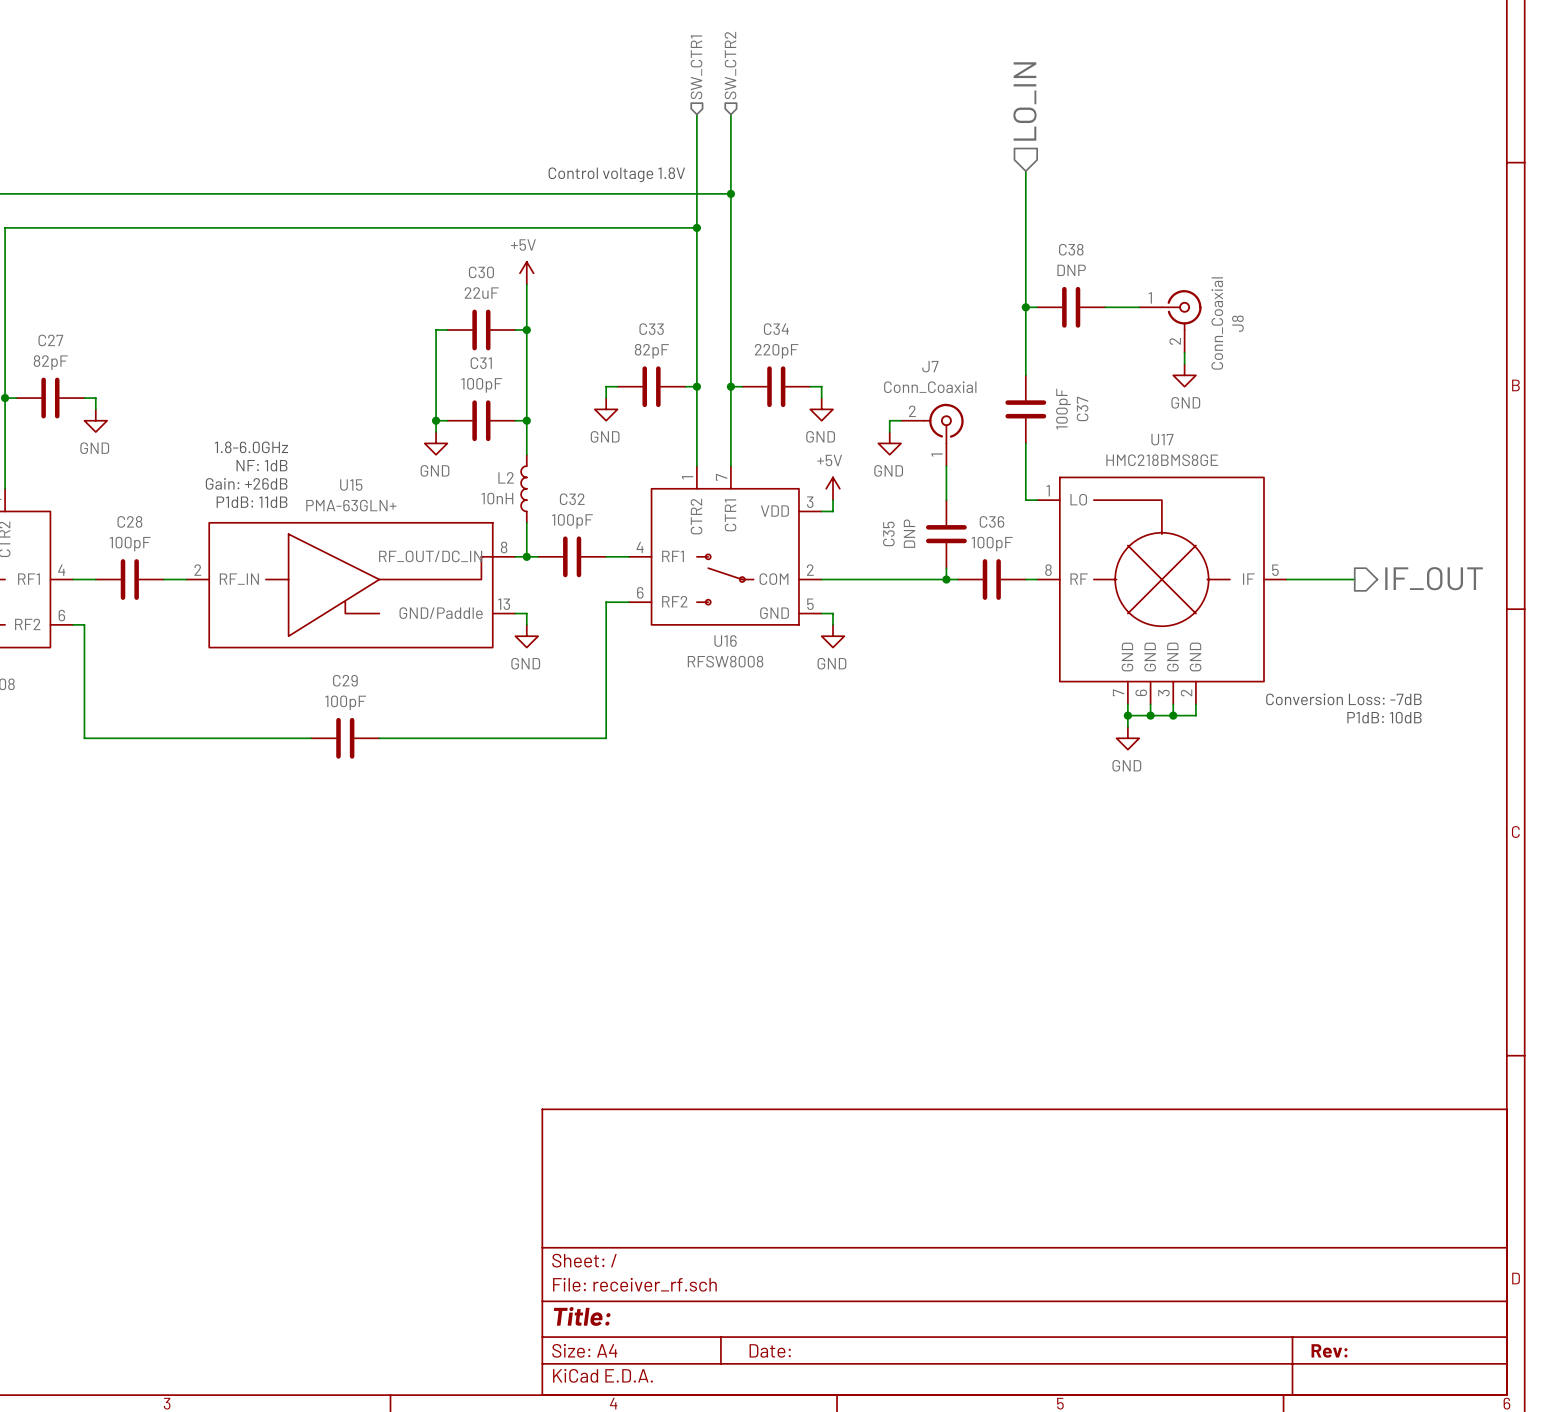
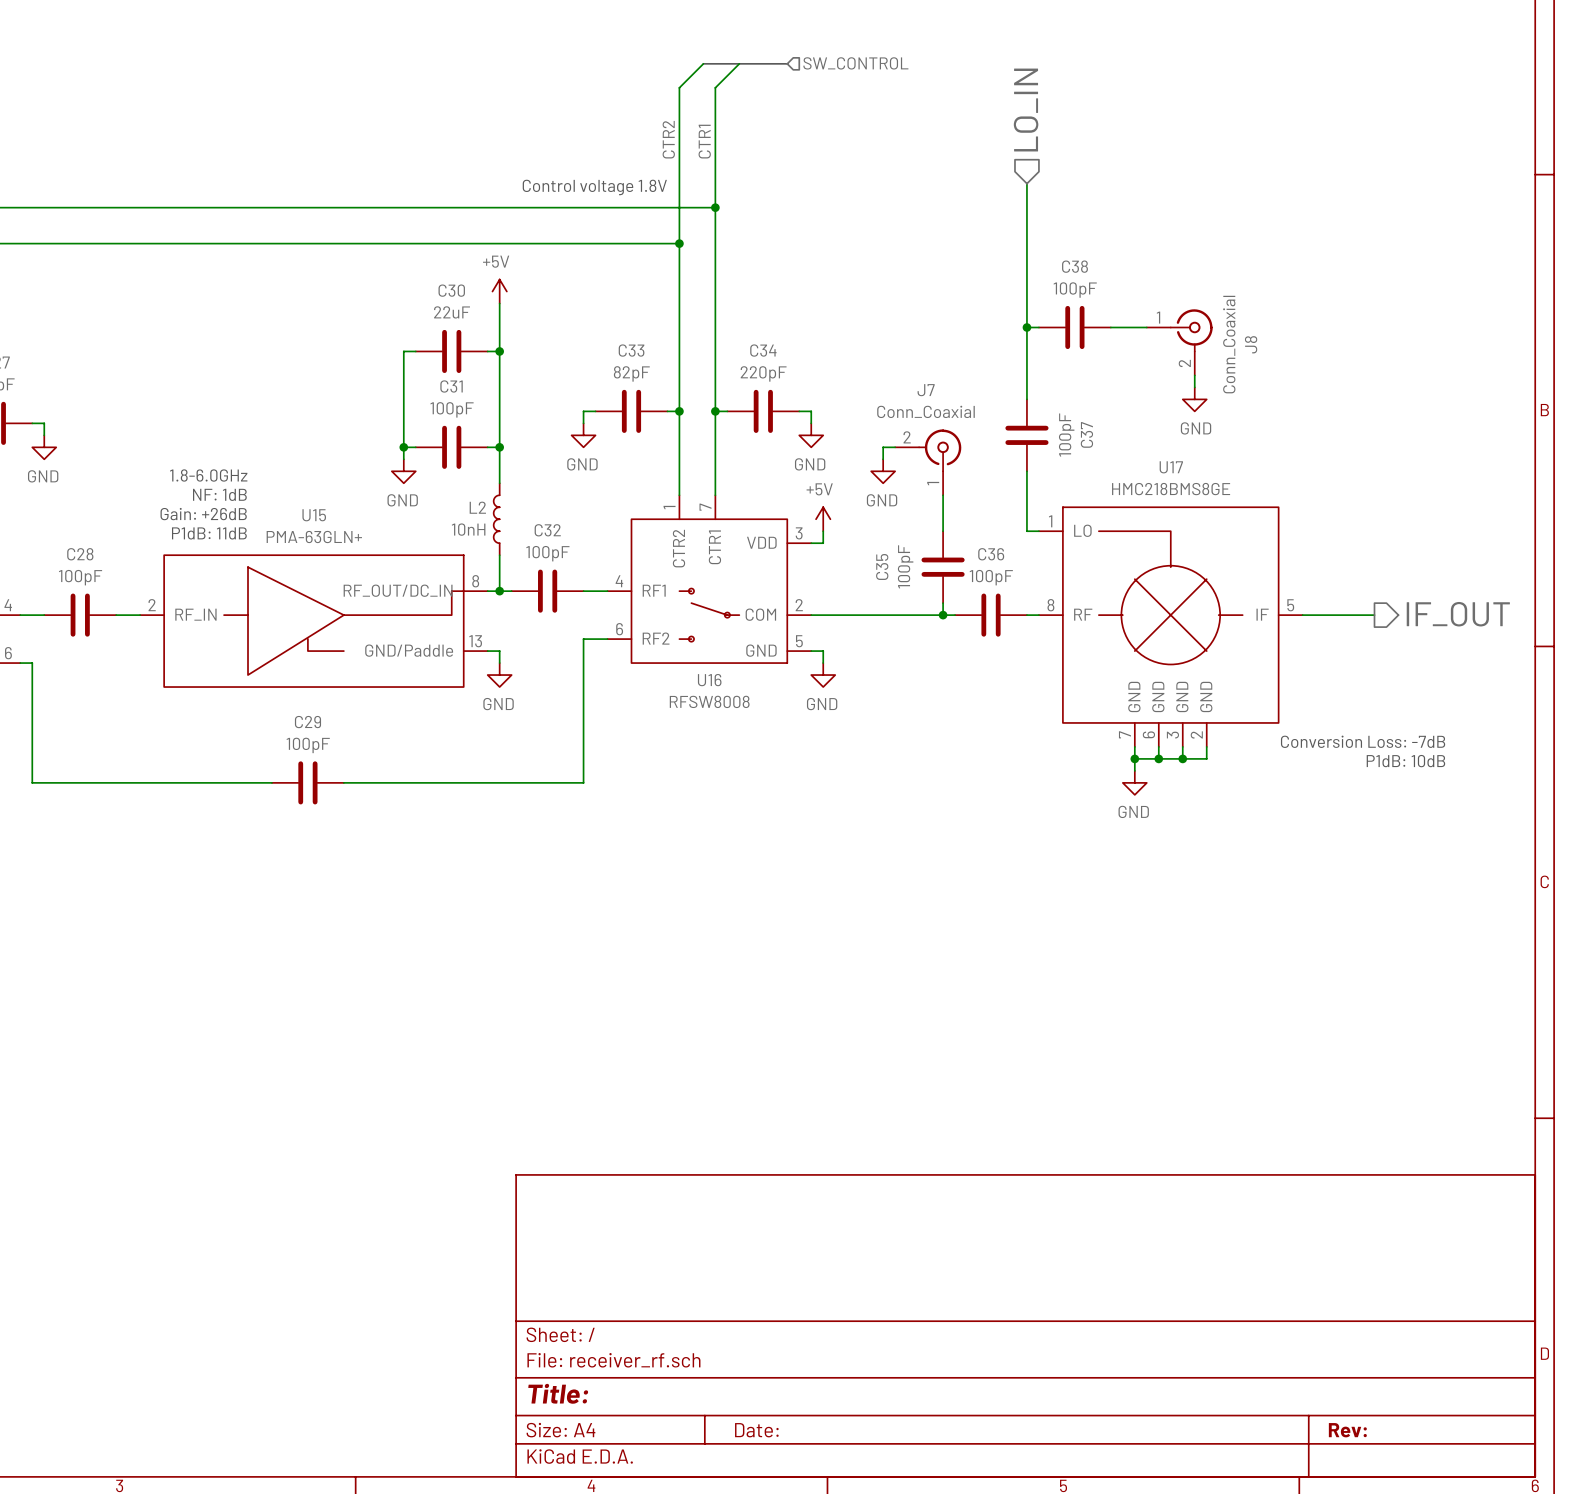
wire: none -> (703, 63) (679, 87) (679, 123)
bus: none -> (703, 63) (787, 63)
wire: none -> (739, 63) (715, 87) (715, 123)
hierarchical label: none -> SW_CONTROL (855, 63)
hierarchical label: SW_CTR2 (730, 65) -> none
hierarchical label: SW_CTR1 (696, 67) -> none
label: none -> CTR2 (668, 139)
label: none -> CTR1 (704, 141)
C38 value: DNP (1071, 270) -> 100pF (1075, 290)
C35 value: DNP (909, 533) -> 100pF (905, 566)

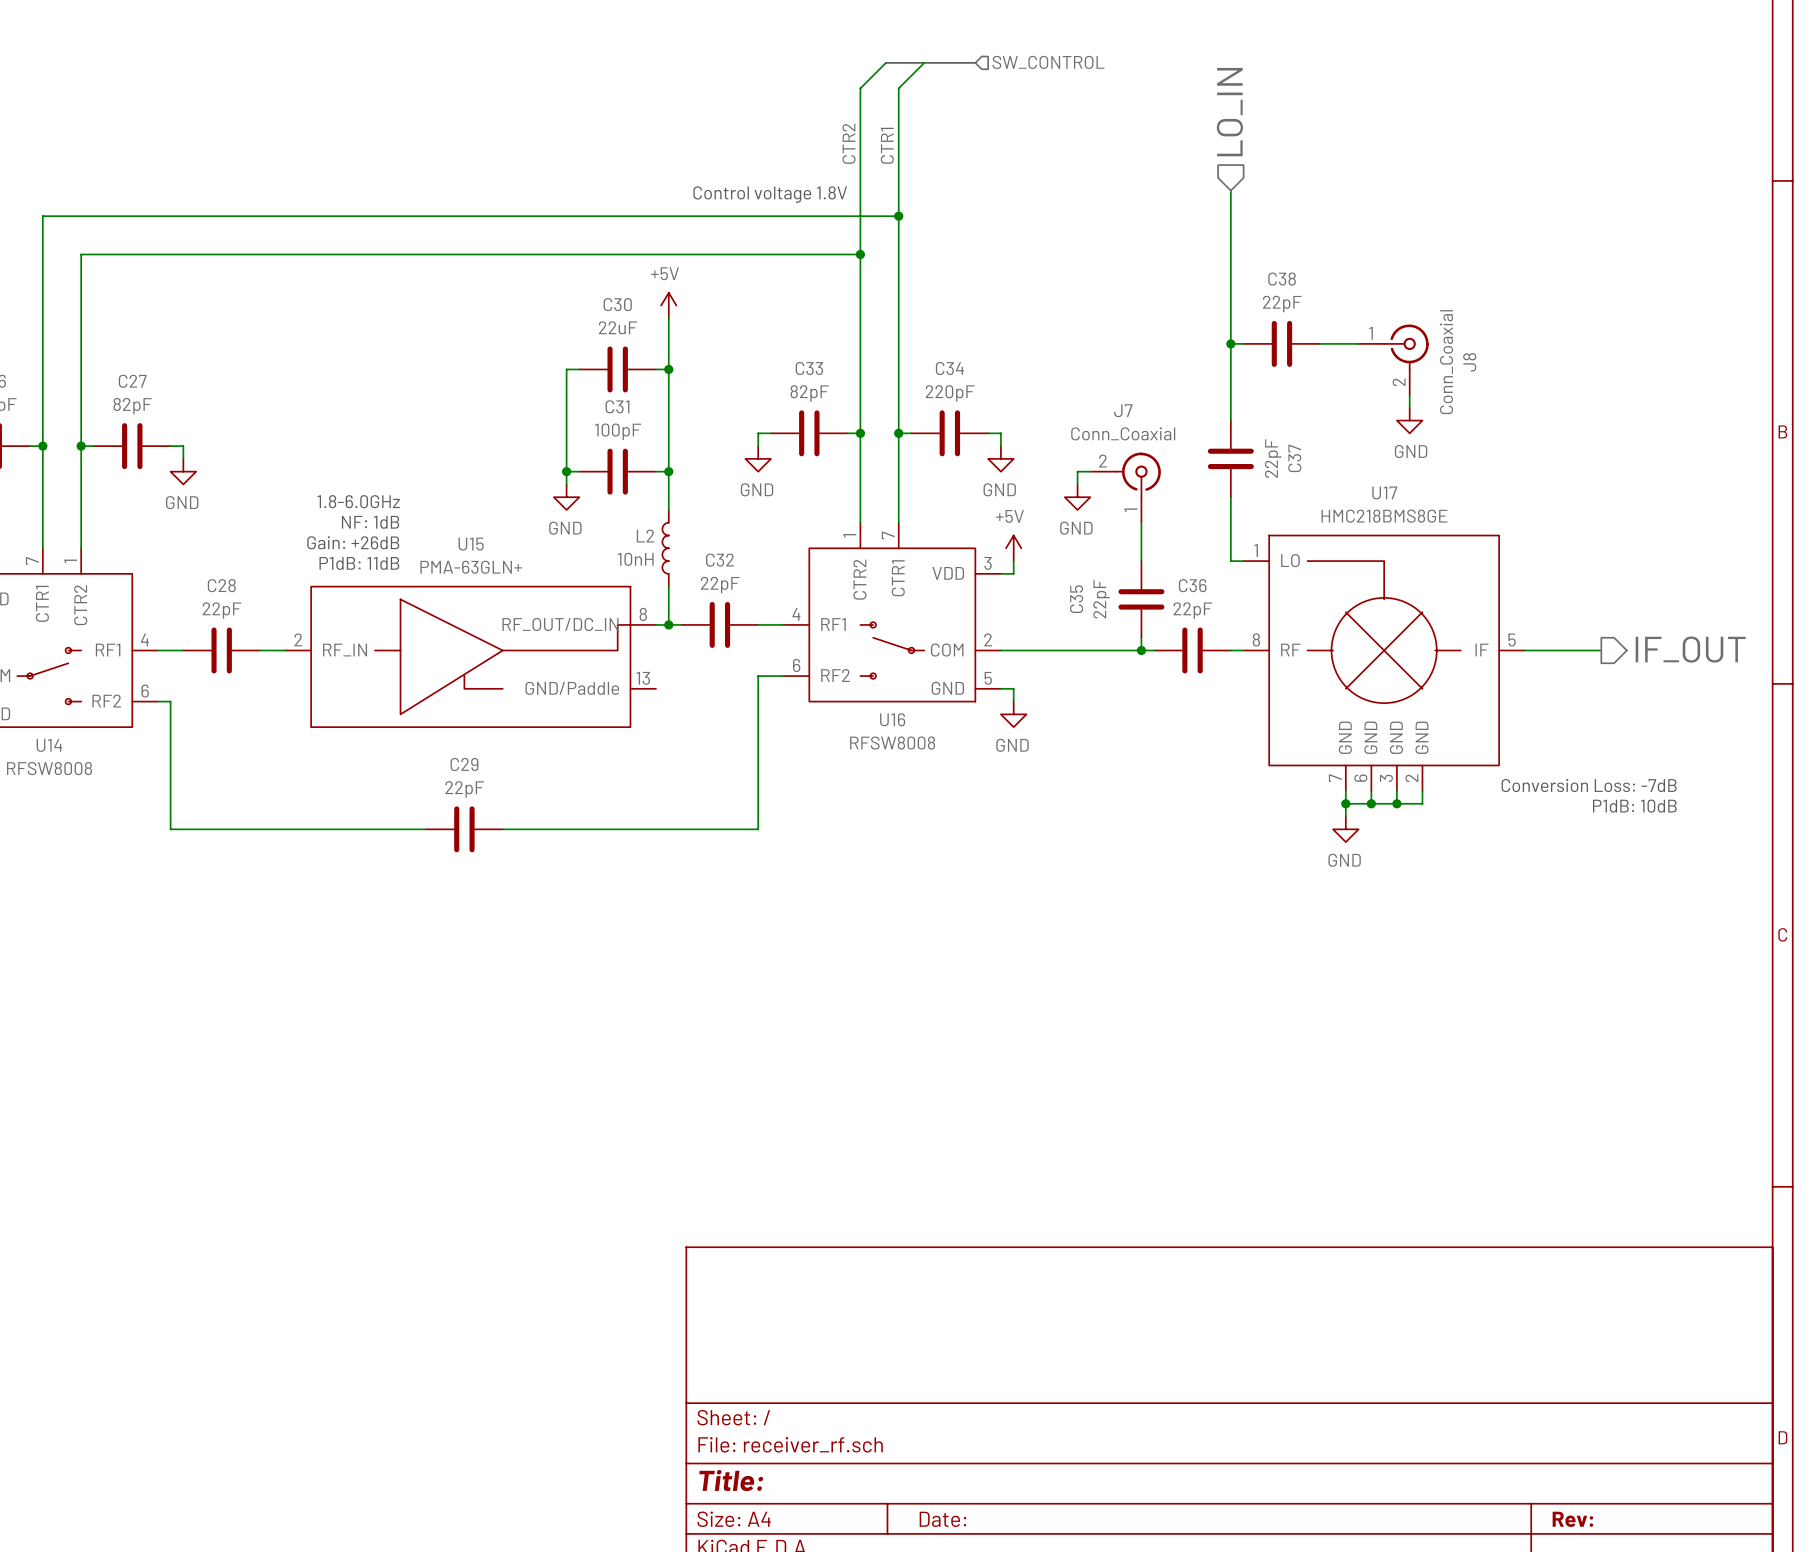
C38 value: 100pF (1075, 290) -> 22pF (1282, 304)
C37 value: 100pF (1066, 435) -> 22pF (1273, 458)
C32 value: 100pF (547, 553) -> 22pF (720, 585)
C35 value: 100pF (905, 566) -> 22pF (1101, 599)
C28 value: 100pF (80, 577) -> 22pF (222, 610)
C36 value: 100pF (991, 577) -> 22pF (1192, 610)
wire: (487, 651) (499, 651) (499, 663) -> none
power symbol: GND (499, 675) -> none
C29 value: 100pF (308, 745) -> 22pF (464, 789)

